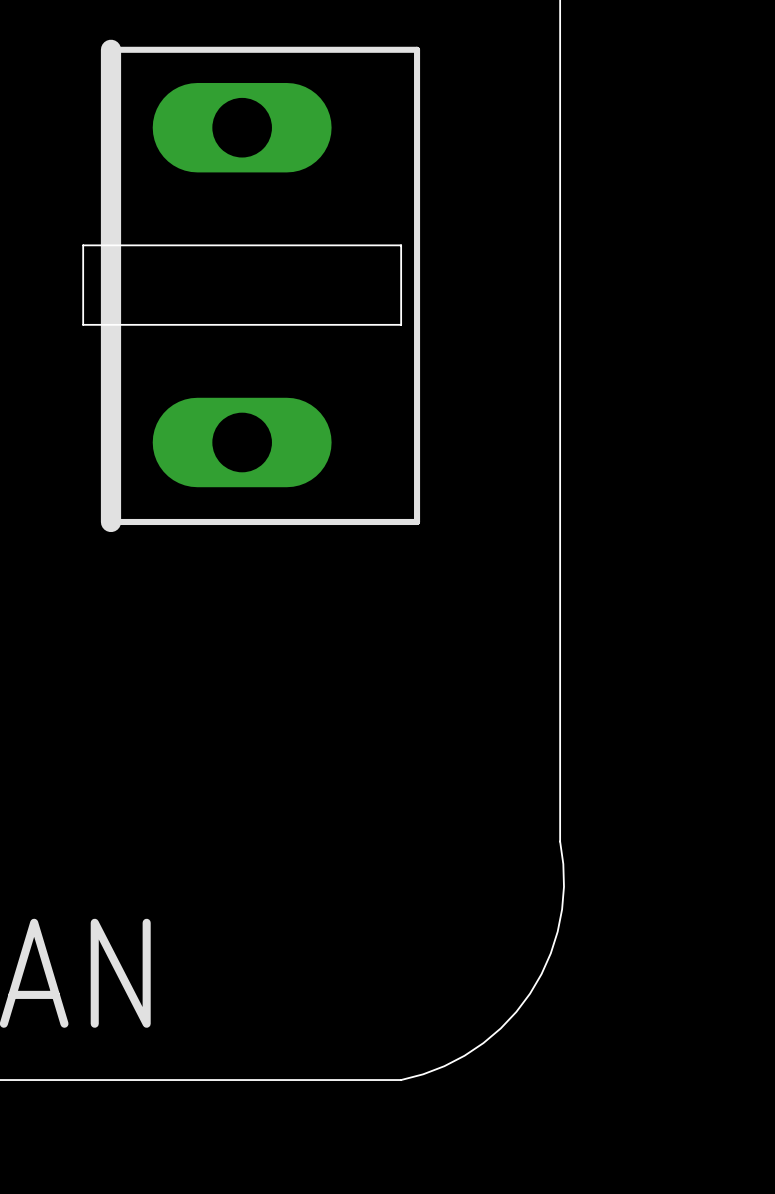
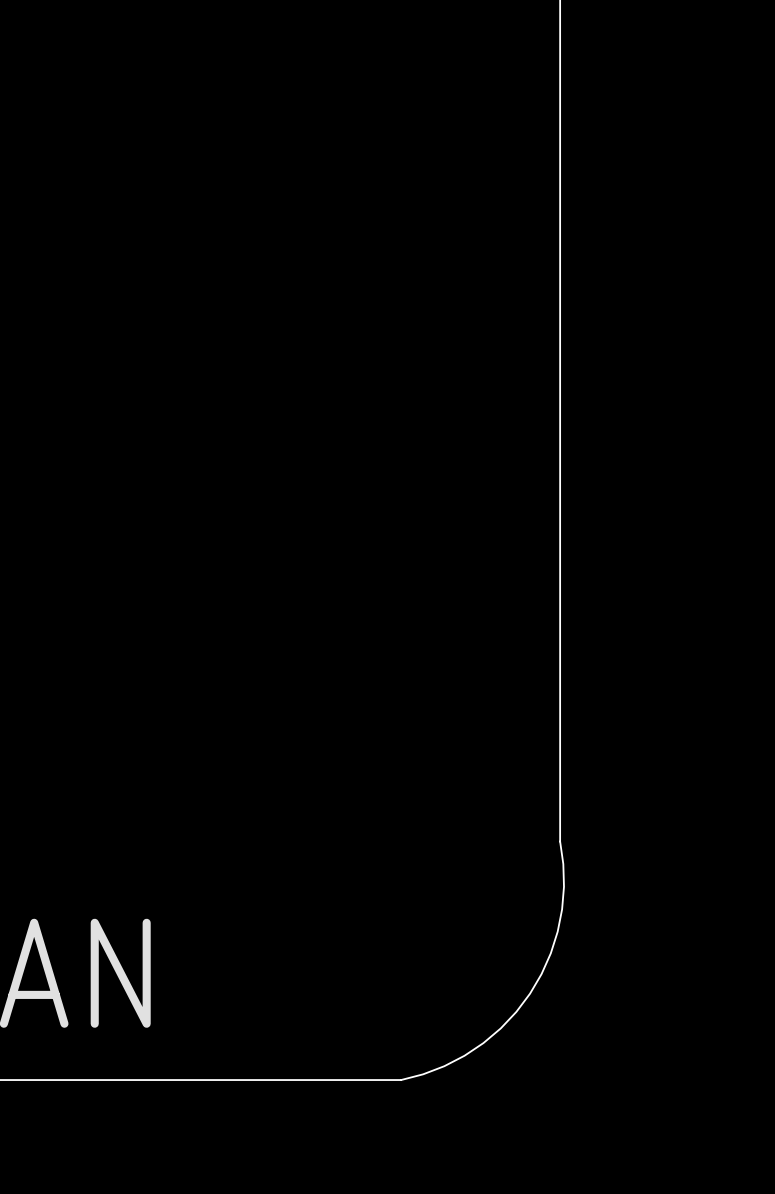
board edge: (83, 245) (401, 245) (401, 324) (83, 324) (83, 245) -> none
part: (260, 285) -> none

